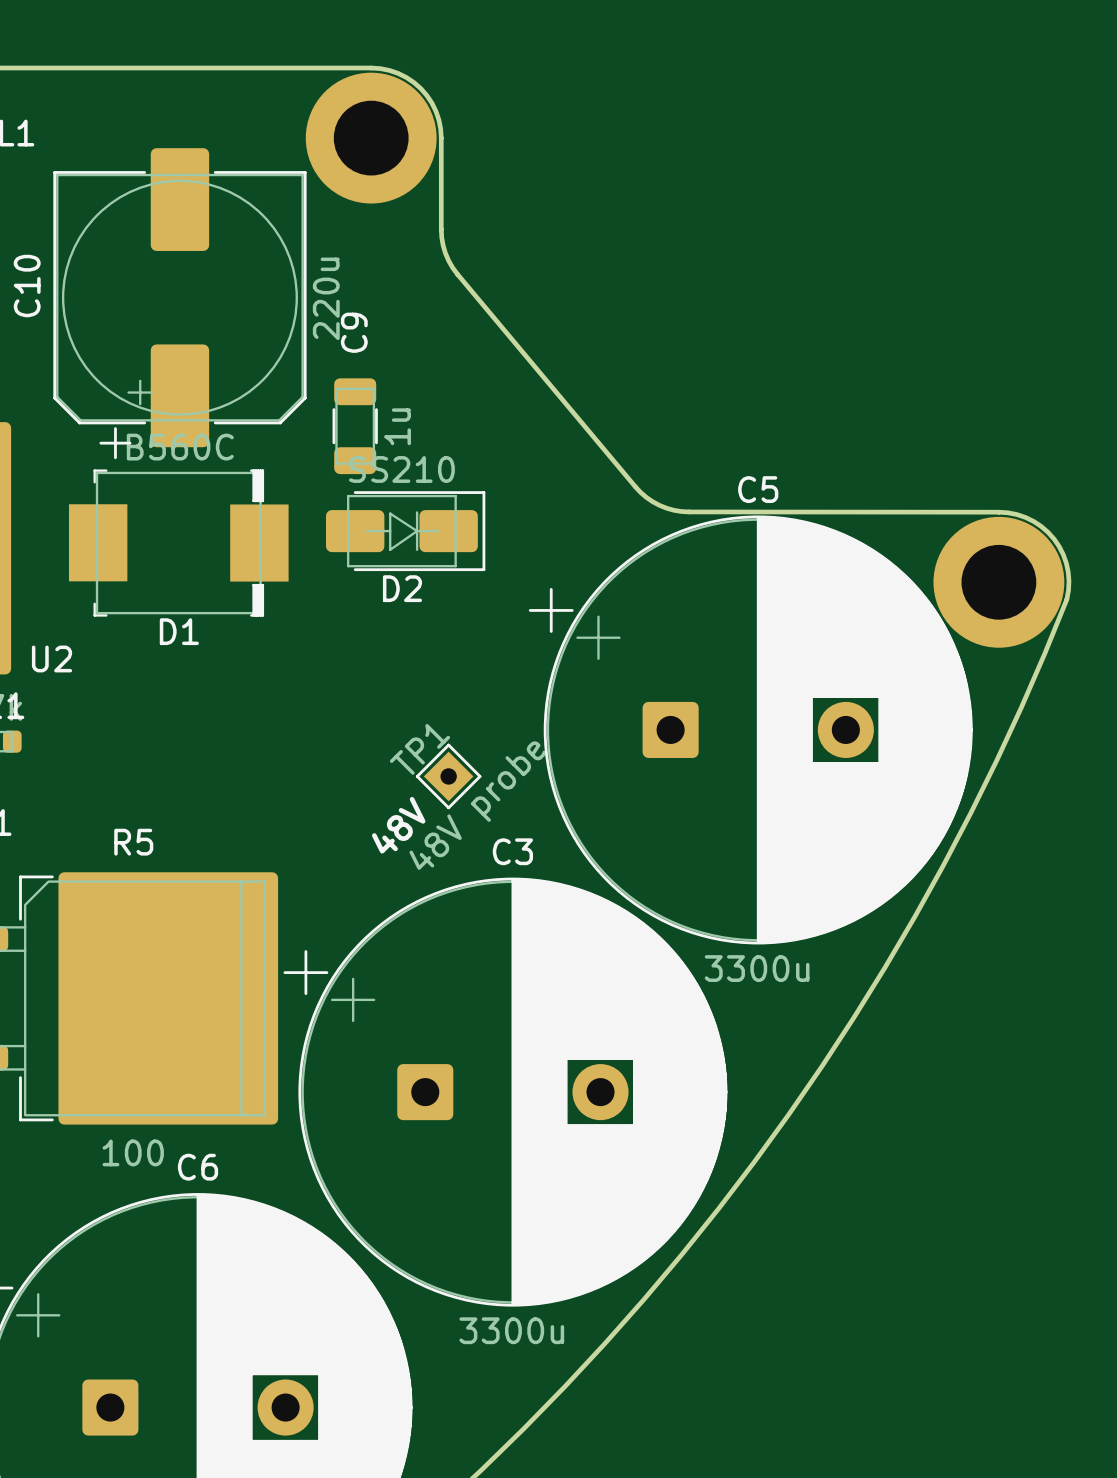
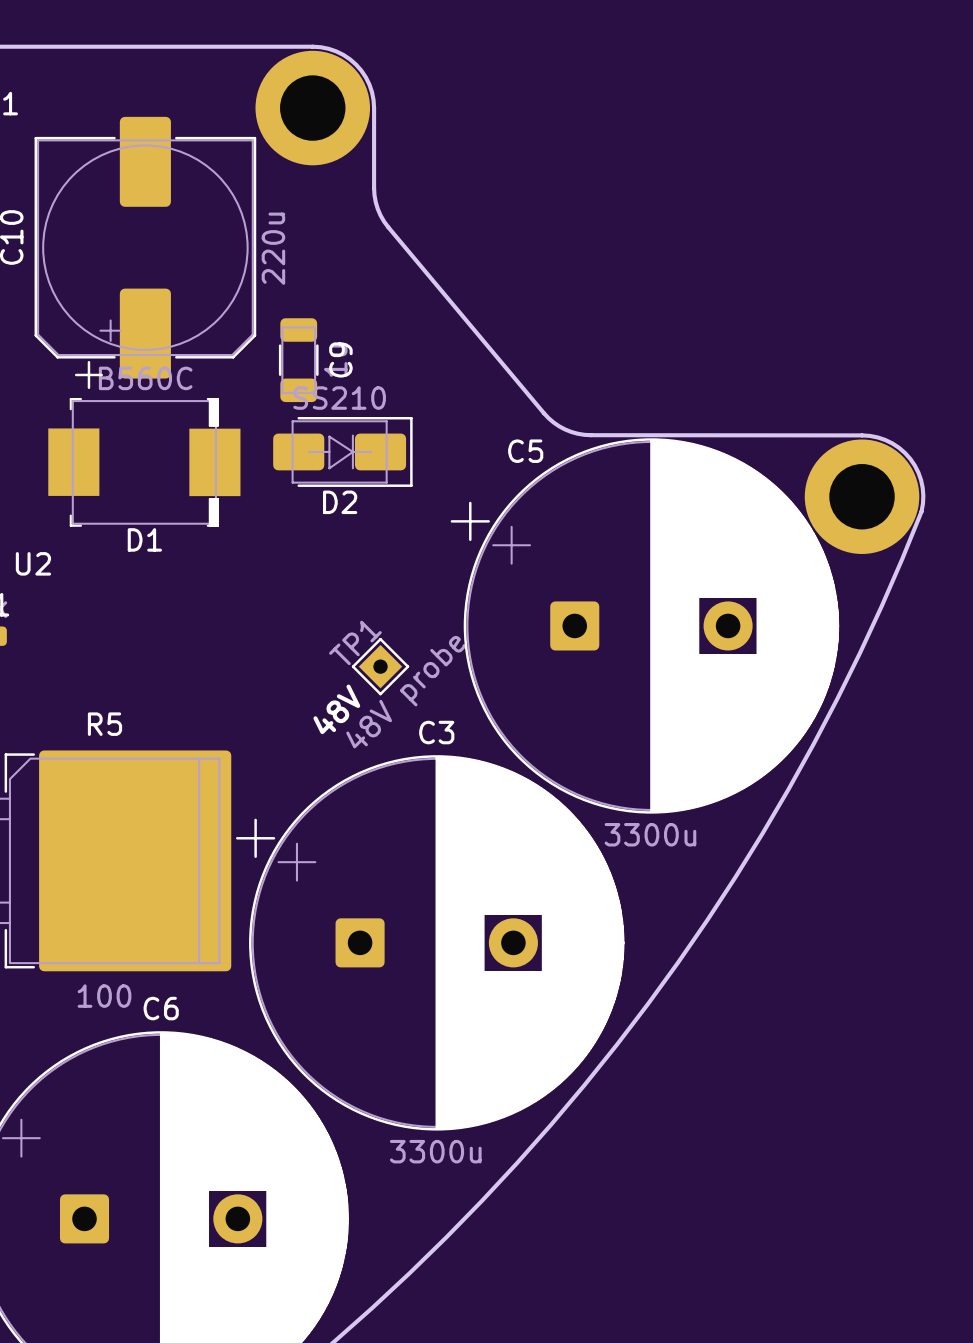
C9 name position: C9 (354, 332) -> C9 (340, 359)
C5 name position: C5 (758, 489) -> C5 (525, 451)

